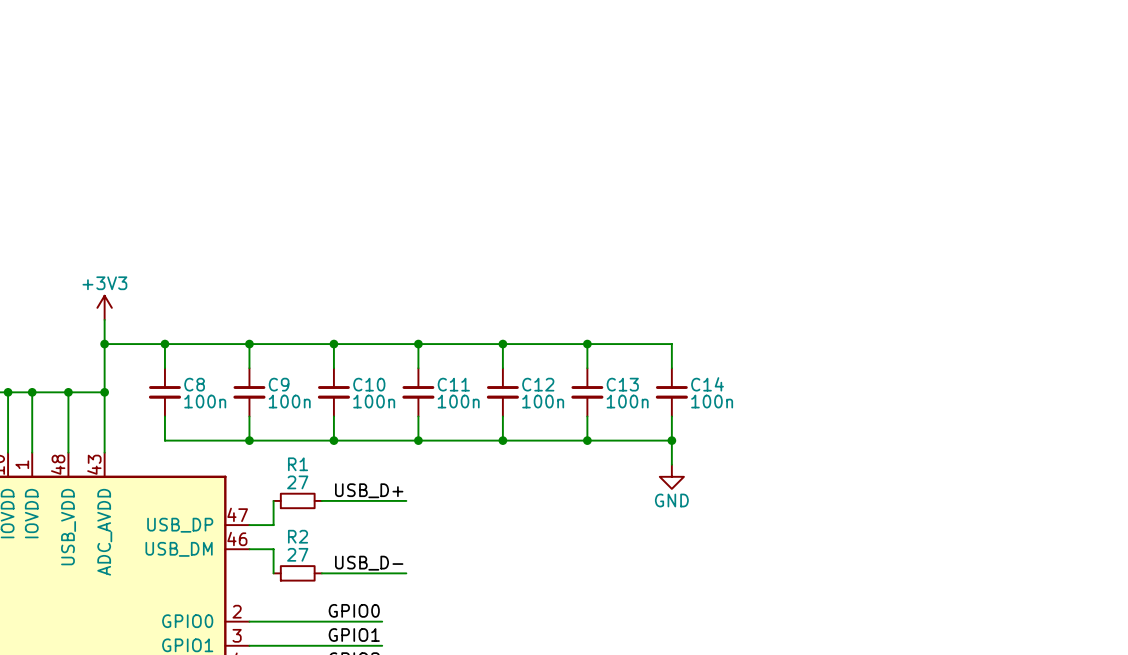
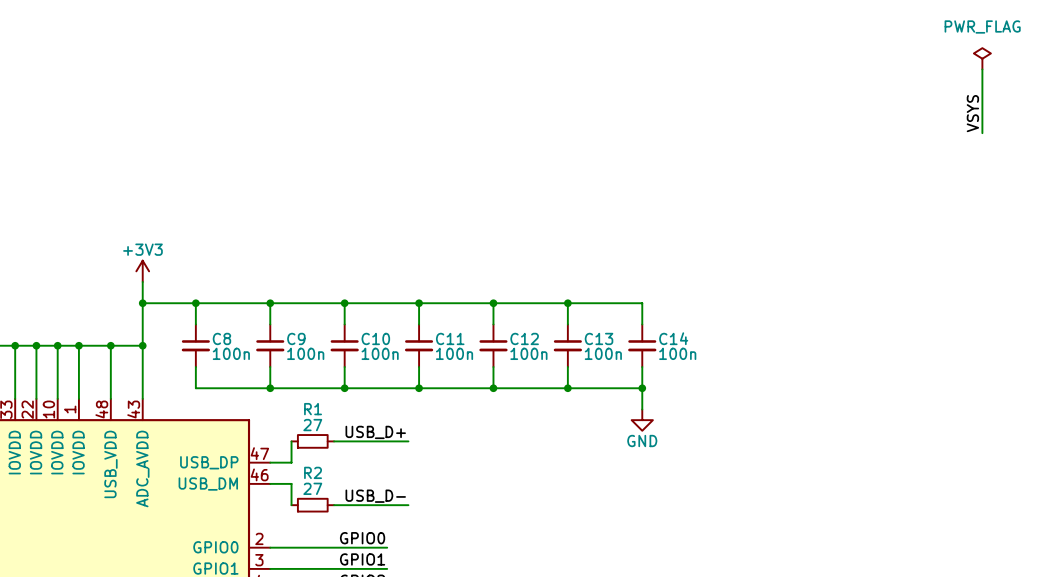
power symbol: none -> PWR_FLAG (982, 58)
wire: none -> (982, 69) (982, 133)
label: none -> VSYS (972, 113)

